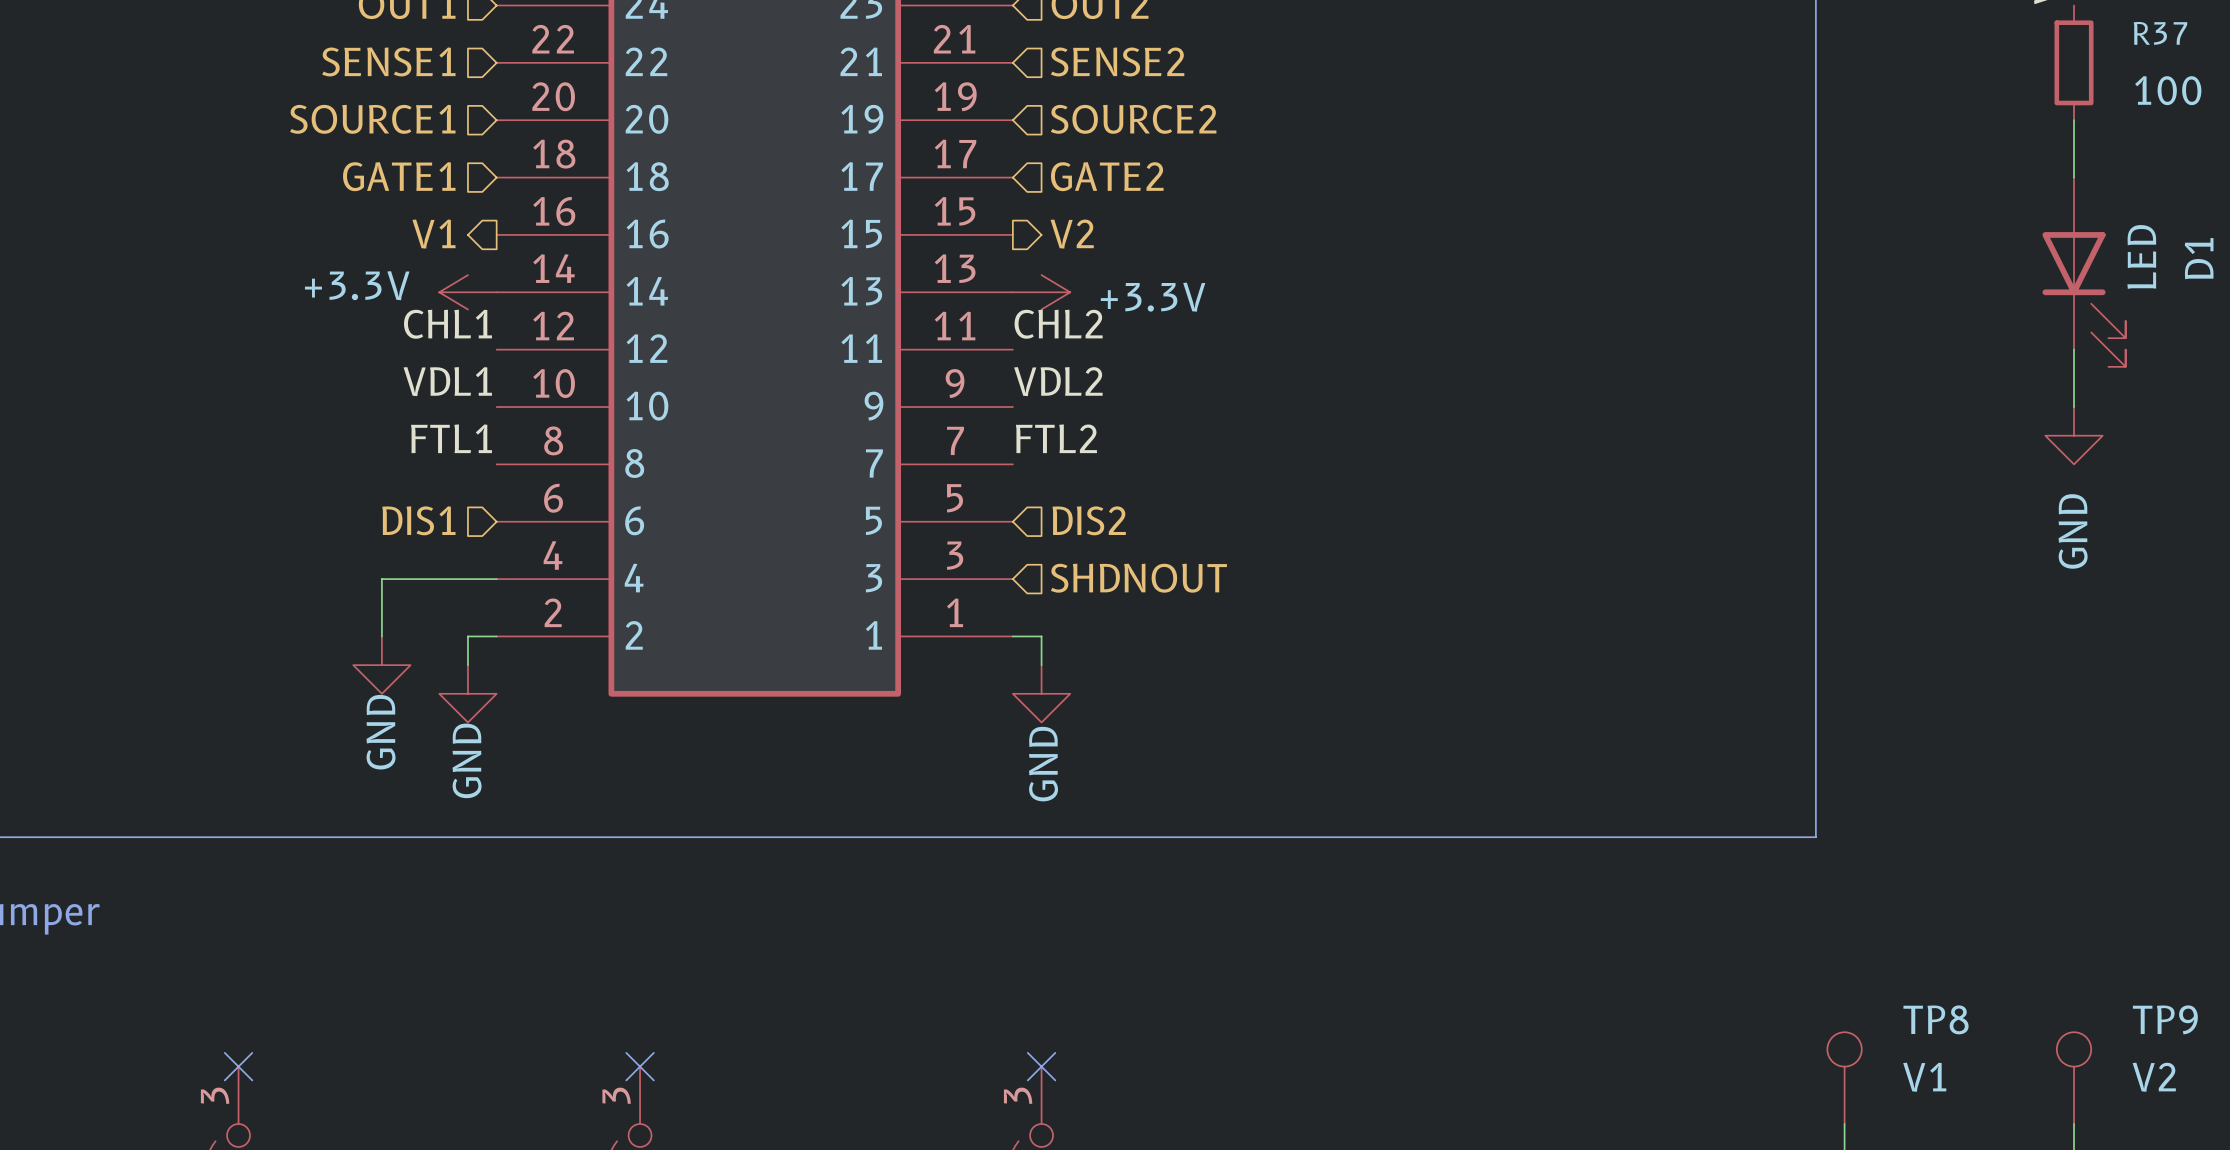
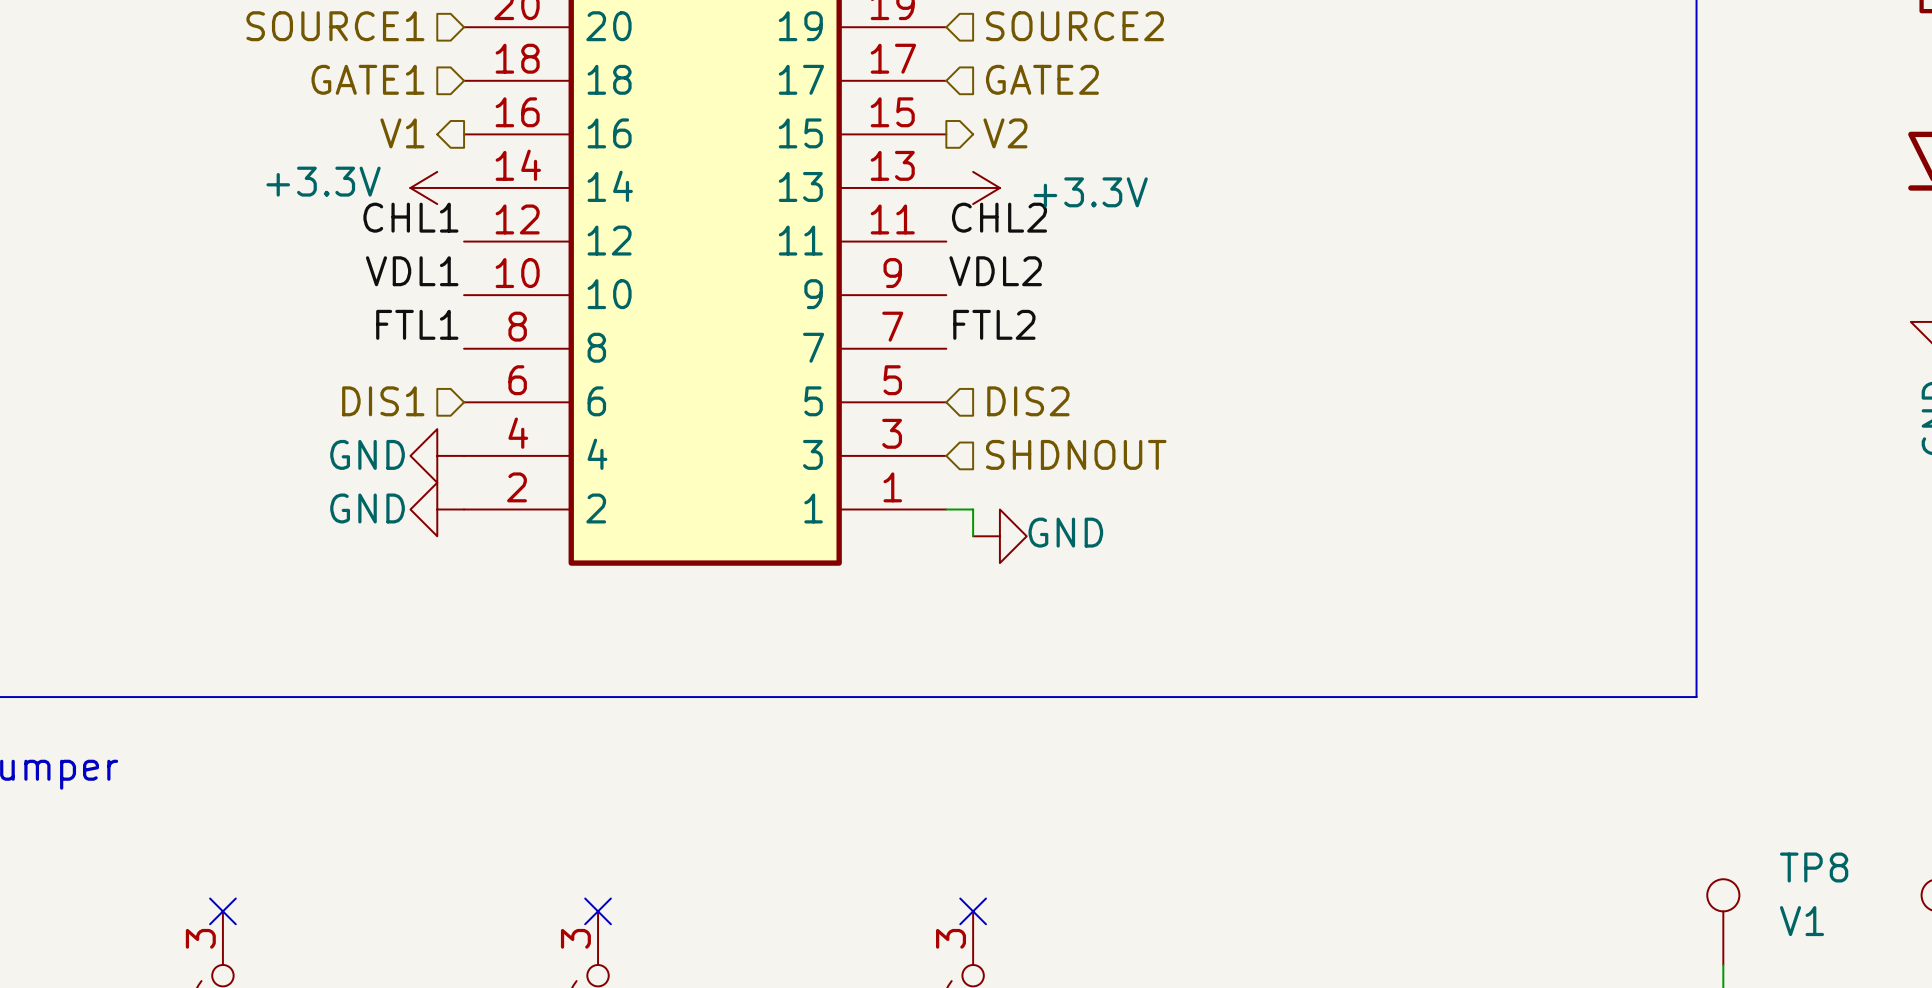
power symbol: none -> GND (437, 455)
wire: (496, 579) (381, 579) (381, 636) -> none
power symbol: none -> GND (437, 509)
power symbol: GND (381, 665) -> none
power symbol: GND (467, 693) -> none
power symbol rotation: 0° (1041, 693) -> 90° counterclockwise (999, 536)
power symbol position: GND (1041, 693) -> GND (999, 536)

